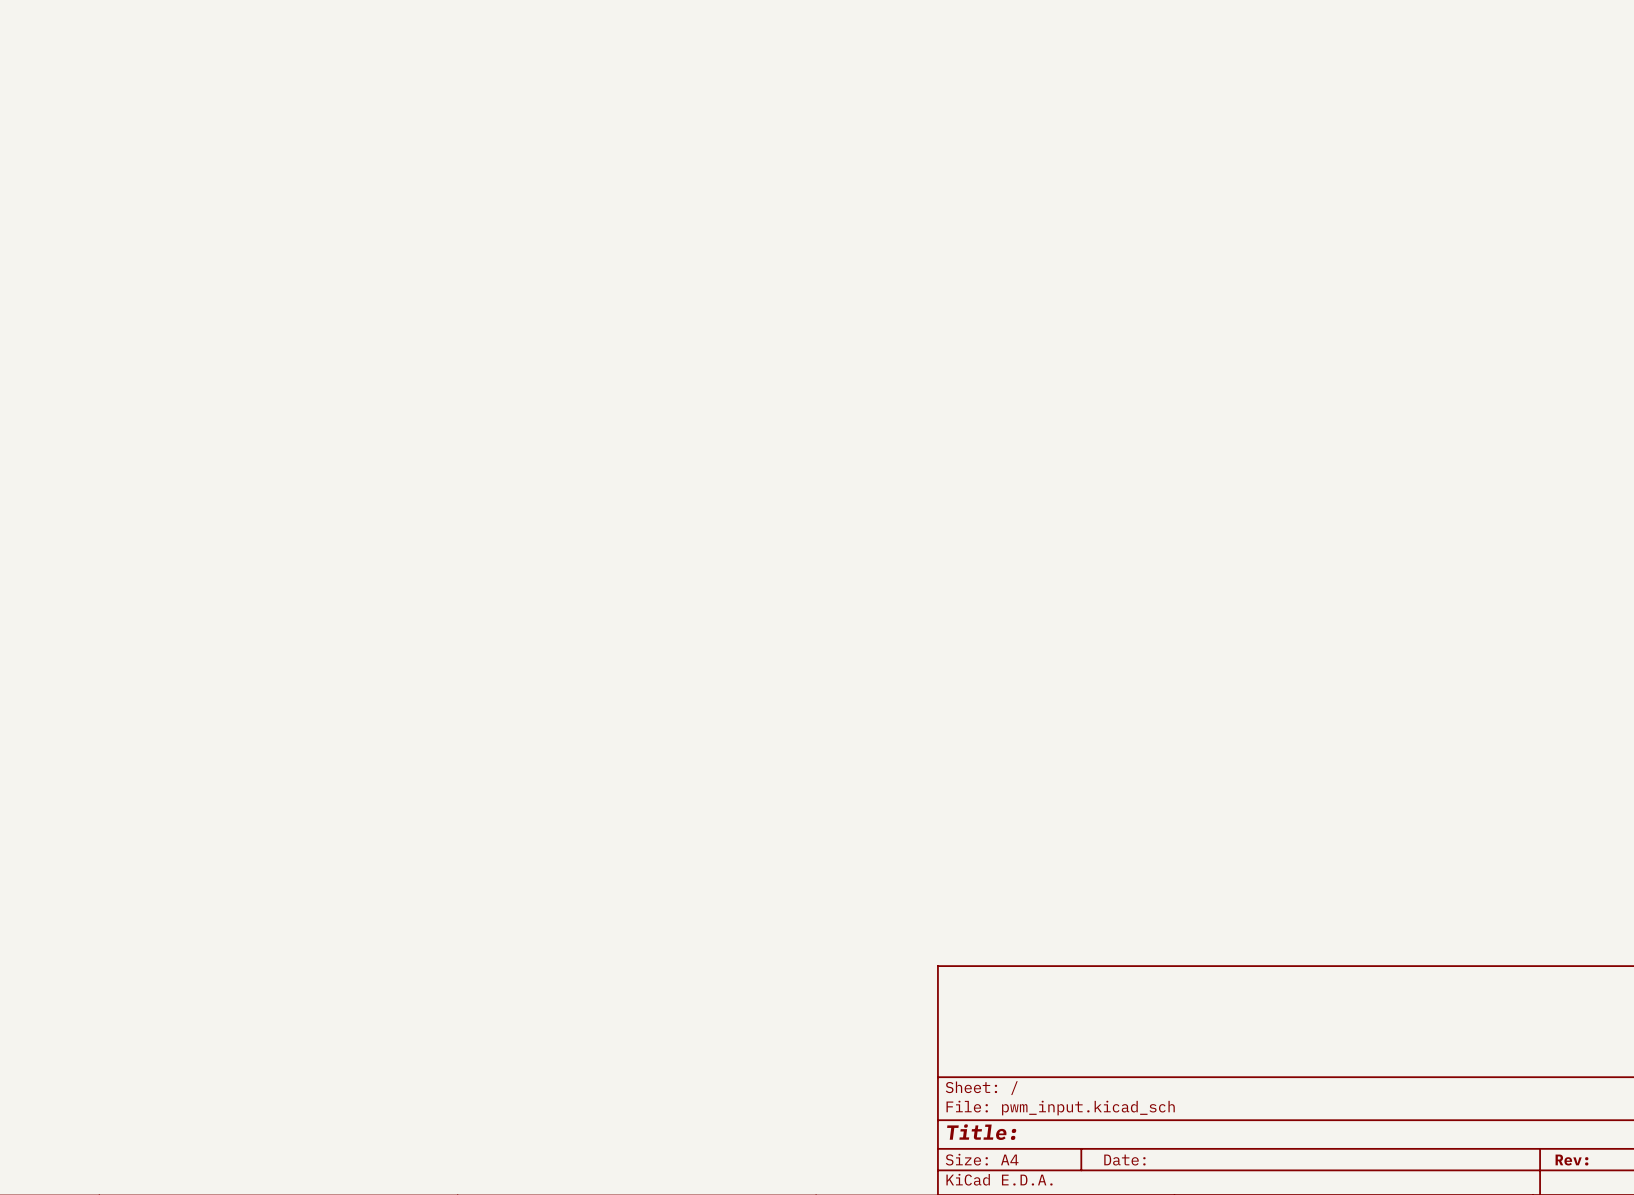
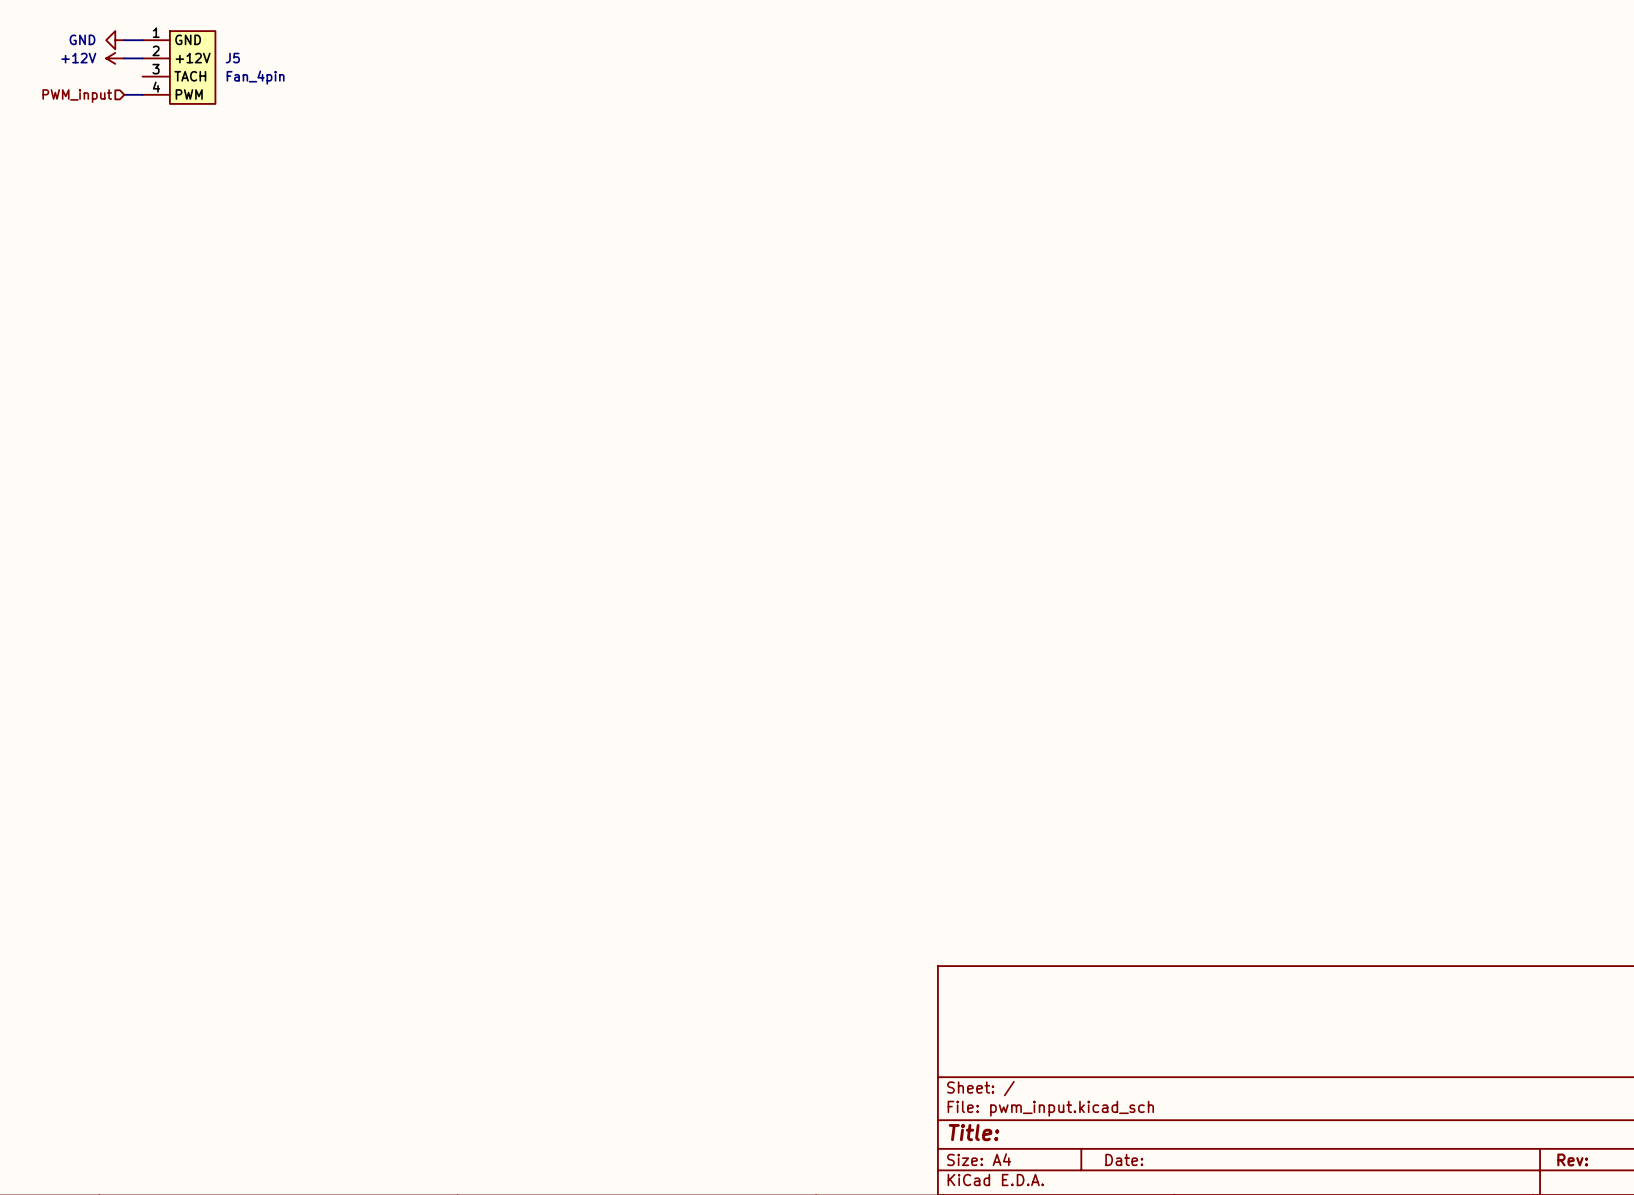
power symbol: none -> GND (115, 40)
wire: none -> (124, 40) (142, 40)
power symbol: none -> +12V (115, 58)
wire: none -> (124, 58) (142, 58)
J5: none -> Fan_4pin (179, 67)
wire: none -> (124, 94) (142, 94)
hierarchical label: none -> PWM_input (77, 96)

